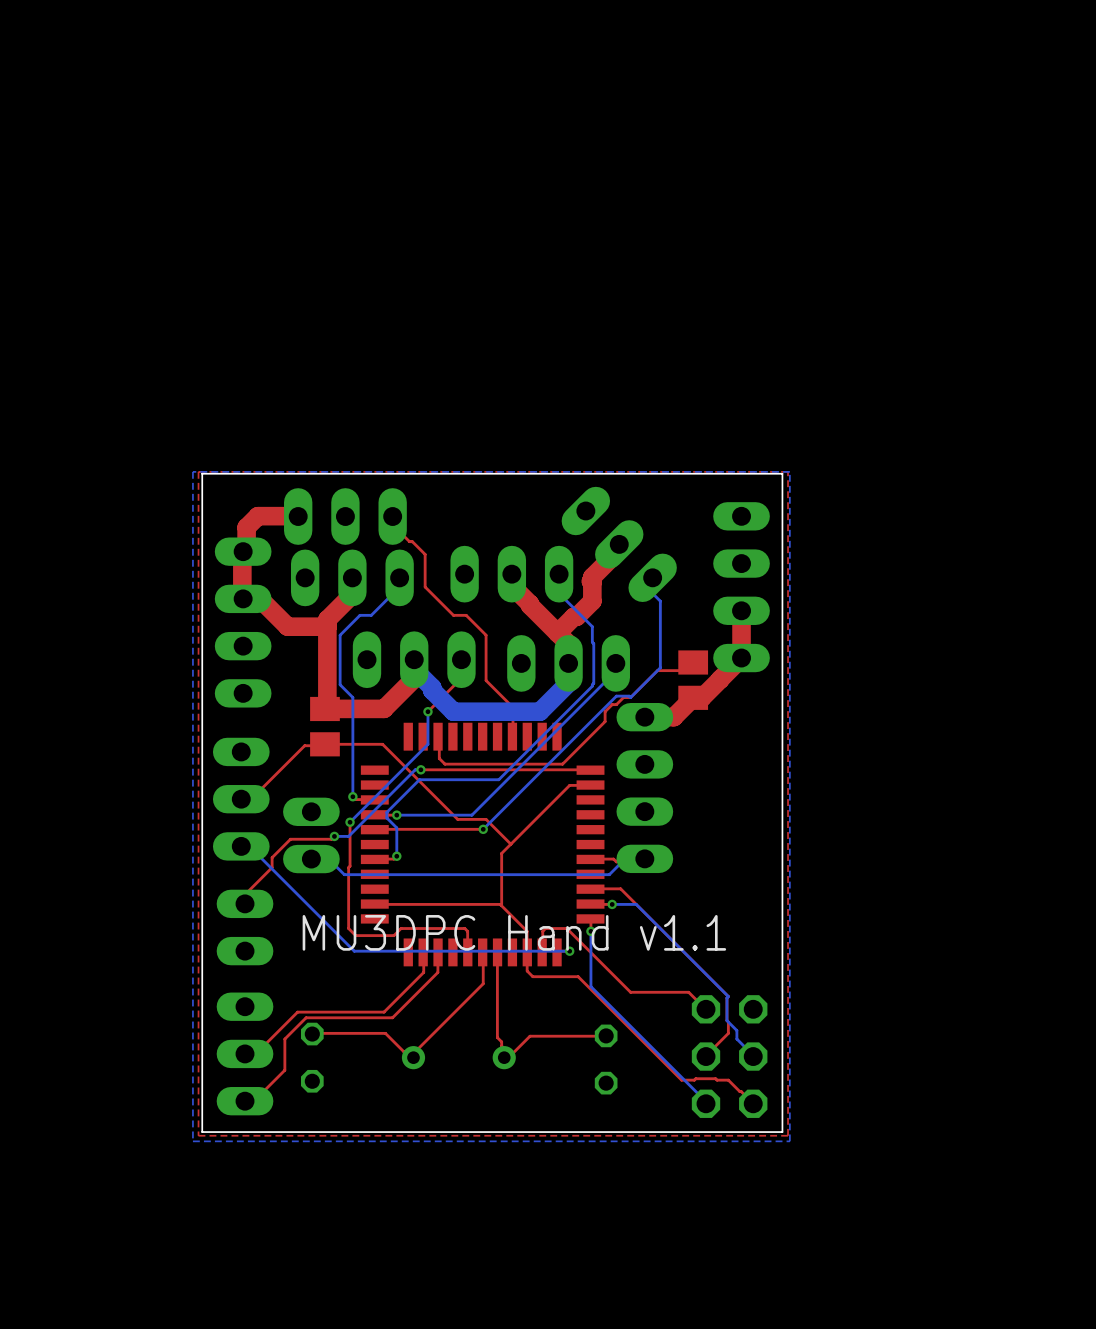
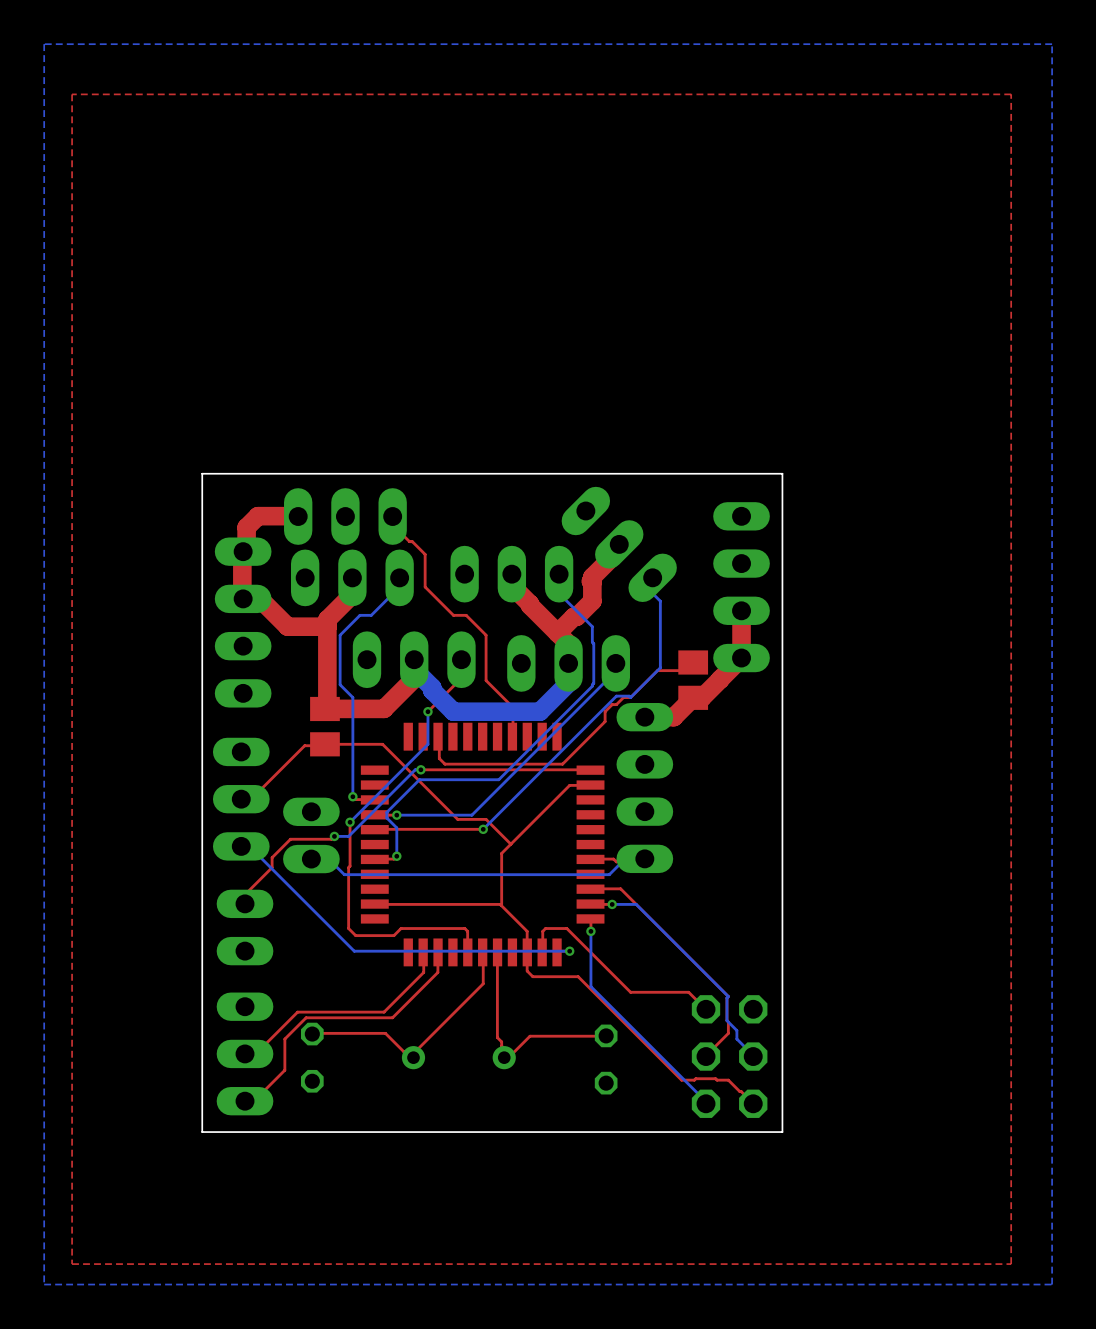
bottom zone outline: none -> (1052, 44) (44, 44) (44, 1284) (1052, 1284) (1052, 44)
top zone outline: none -> (1011, 94) (72, 94) (72, 1264) (1011, 1264) (1011, 94)
top zone outline: (788, 471) (198, 471) (198, 1135) (788, 1135) (788, 471) -> none
bottom zone outline: (789, 471) (192, 471) (192, 1141) (789, 1141) (789, 471) -> none
text: MU3DPC Hand v1.1 (514, 932) -> none

